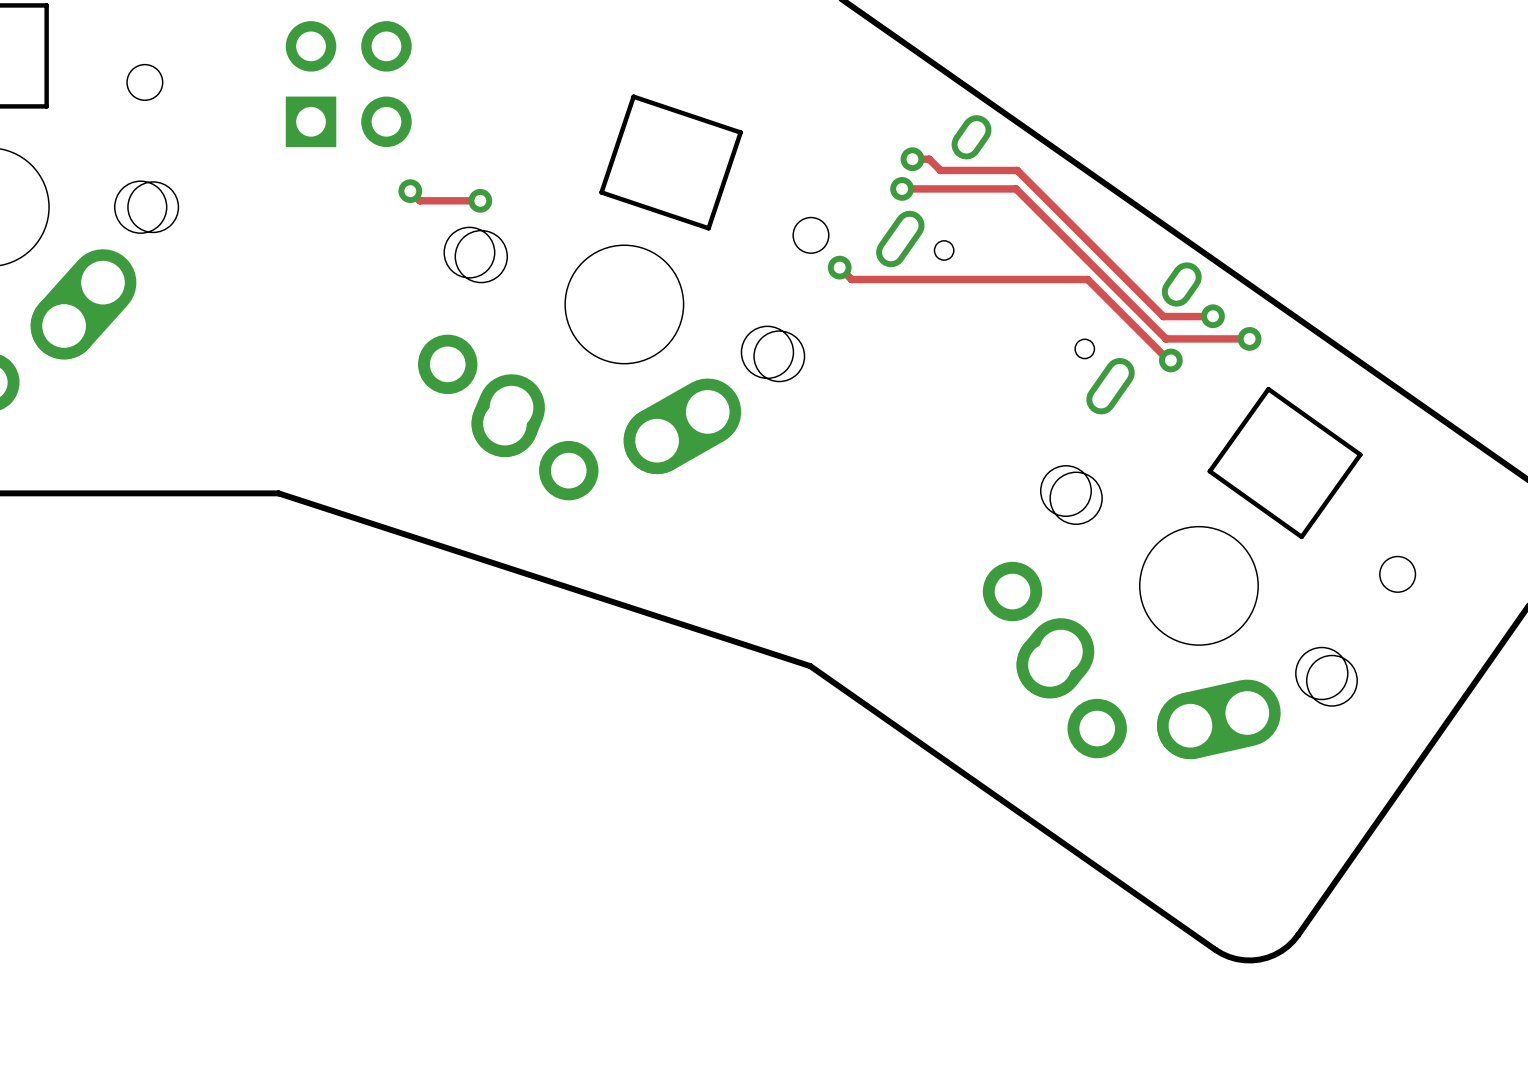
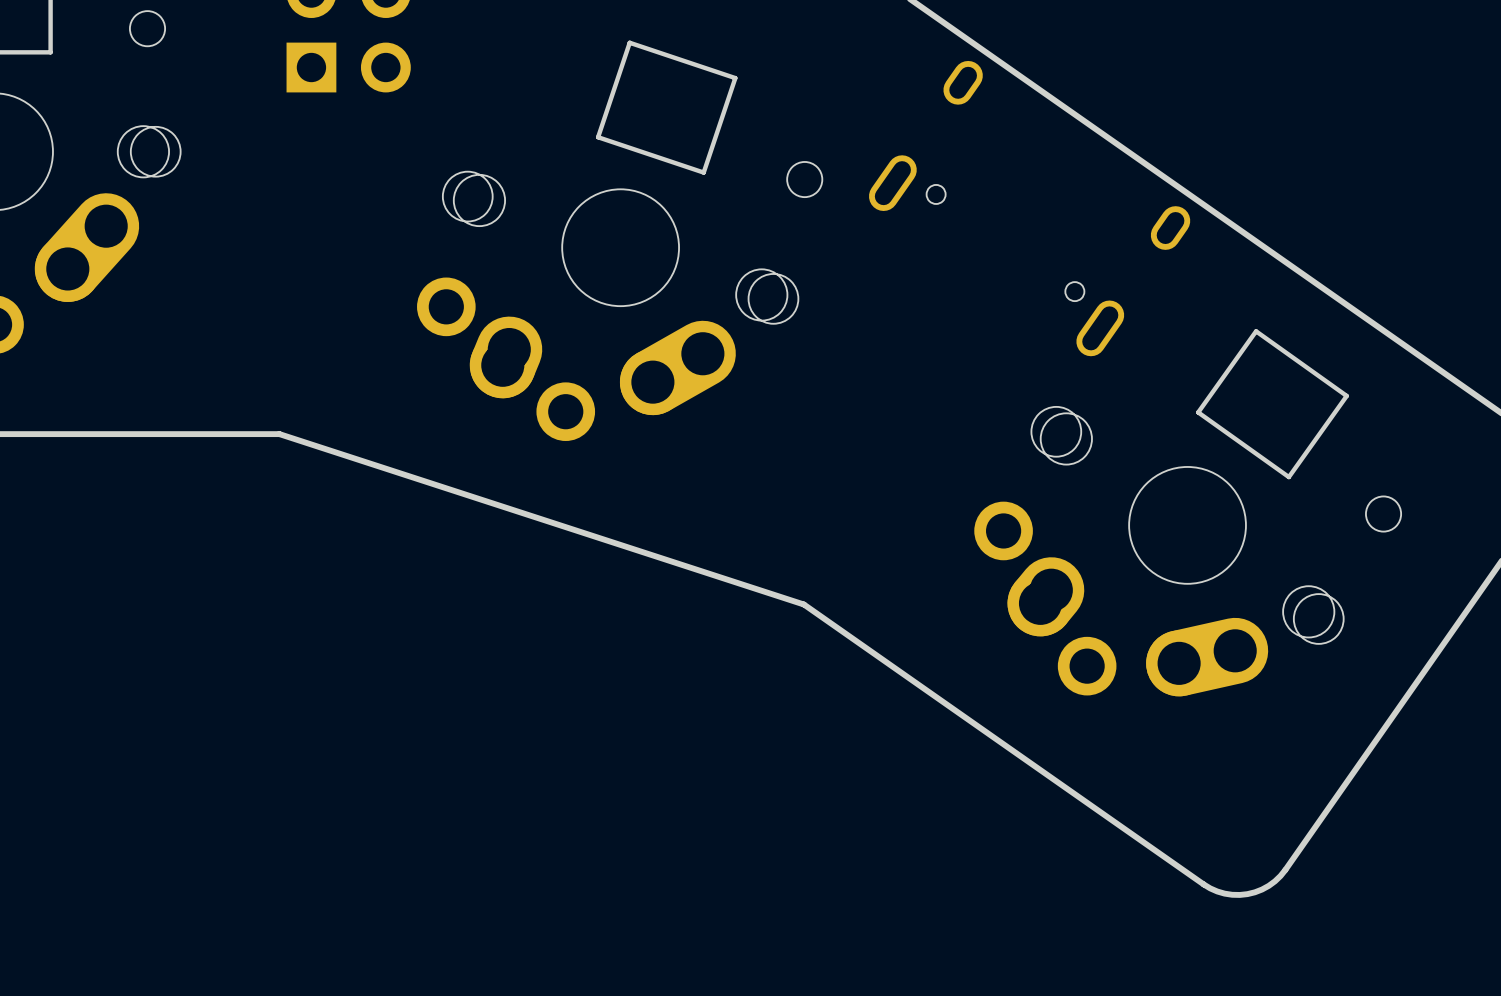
track: (912, 159) (929, 159) (940, 170) (1017, 170) (1163, 316) (1212, 316) -> none
via: (912, 159) -> none
track: (902, 188) (1016, 188) (1166, 338) (1249, 338) -> none
via: (902, 188) -> none
track: (410, 191) (419, 200) (480, 200) -> none
via: (410, 191) -> none
via: (480, 200) -> none
track: (839, 267) (851, 279) (1087, 279) (1168, 360) (1170, 360) -> none
via: (839, 267) -> none
via: (1213, 316) -> none
via: (1249, 338) -> none
via: (1170, 360) -> none

